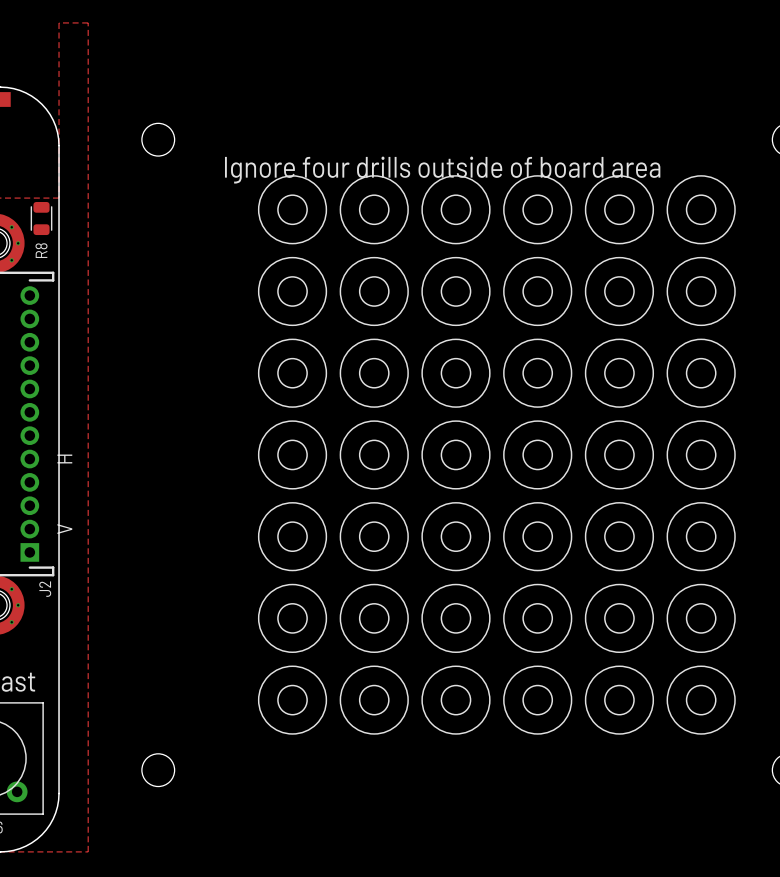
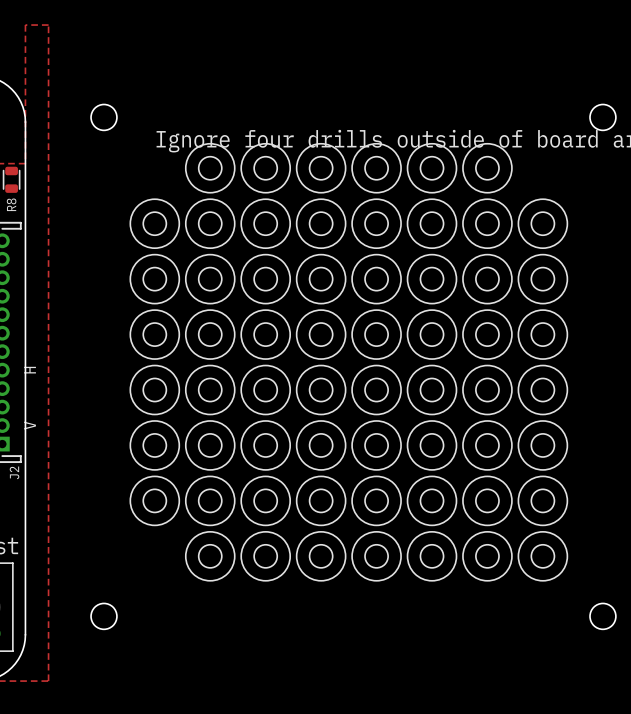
drawing: none -> [129, 143, 568, 582]
drawing shape: [257, 175, 328, 245] -> [185, 143, 236, 194]
drawing: [257, 175, 736, 735] -> none
drawing shape: [257, 583, 328, 653] -> [185, 475, 236, 526]
drawing shape: [257, 665, 328, 735] -> [185, 531, 236, 582]

